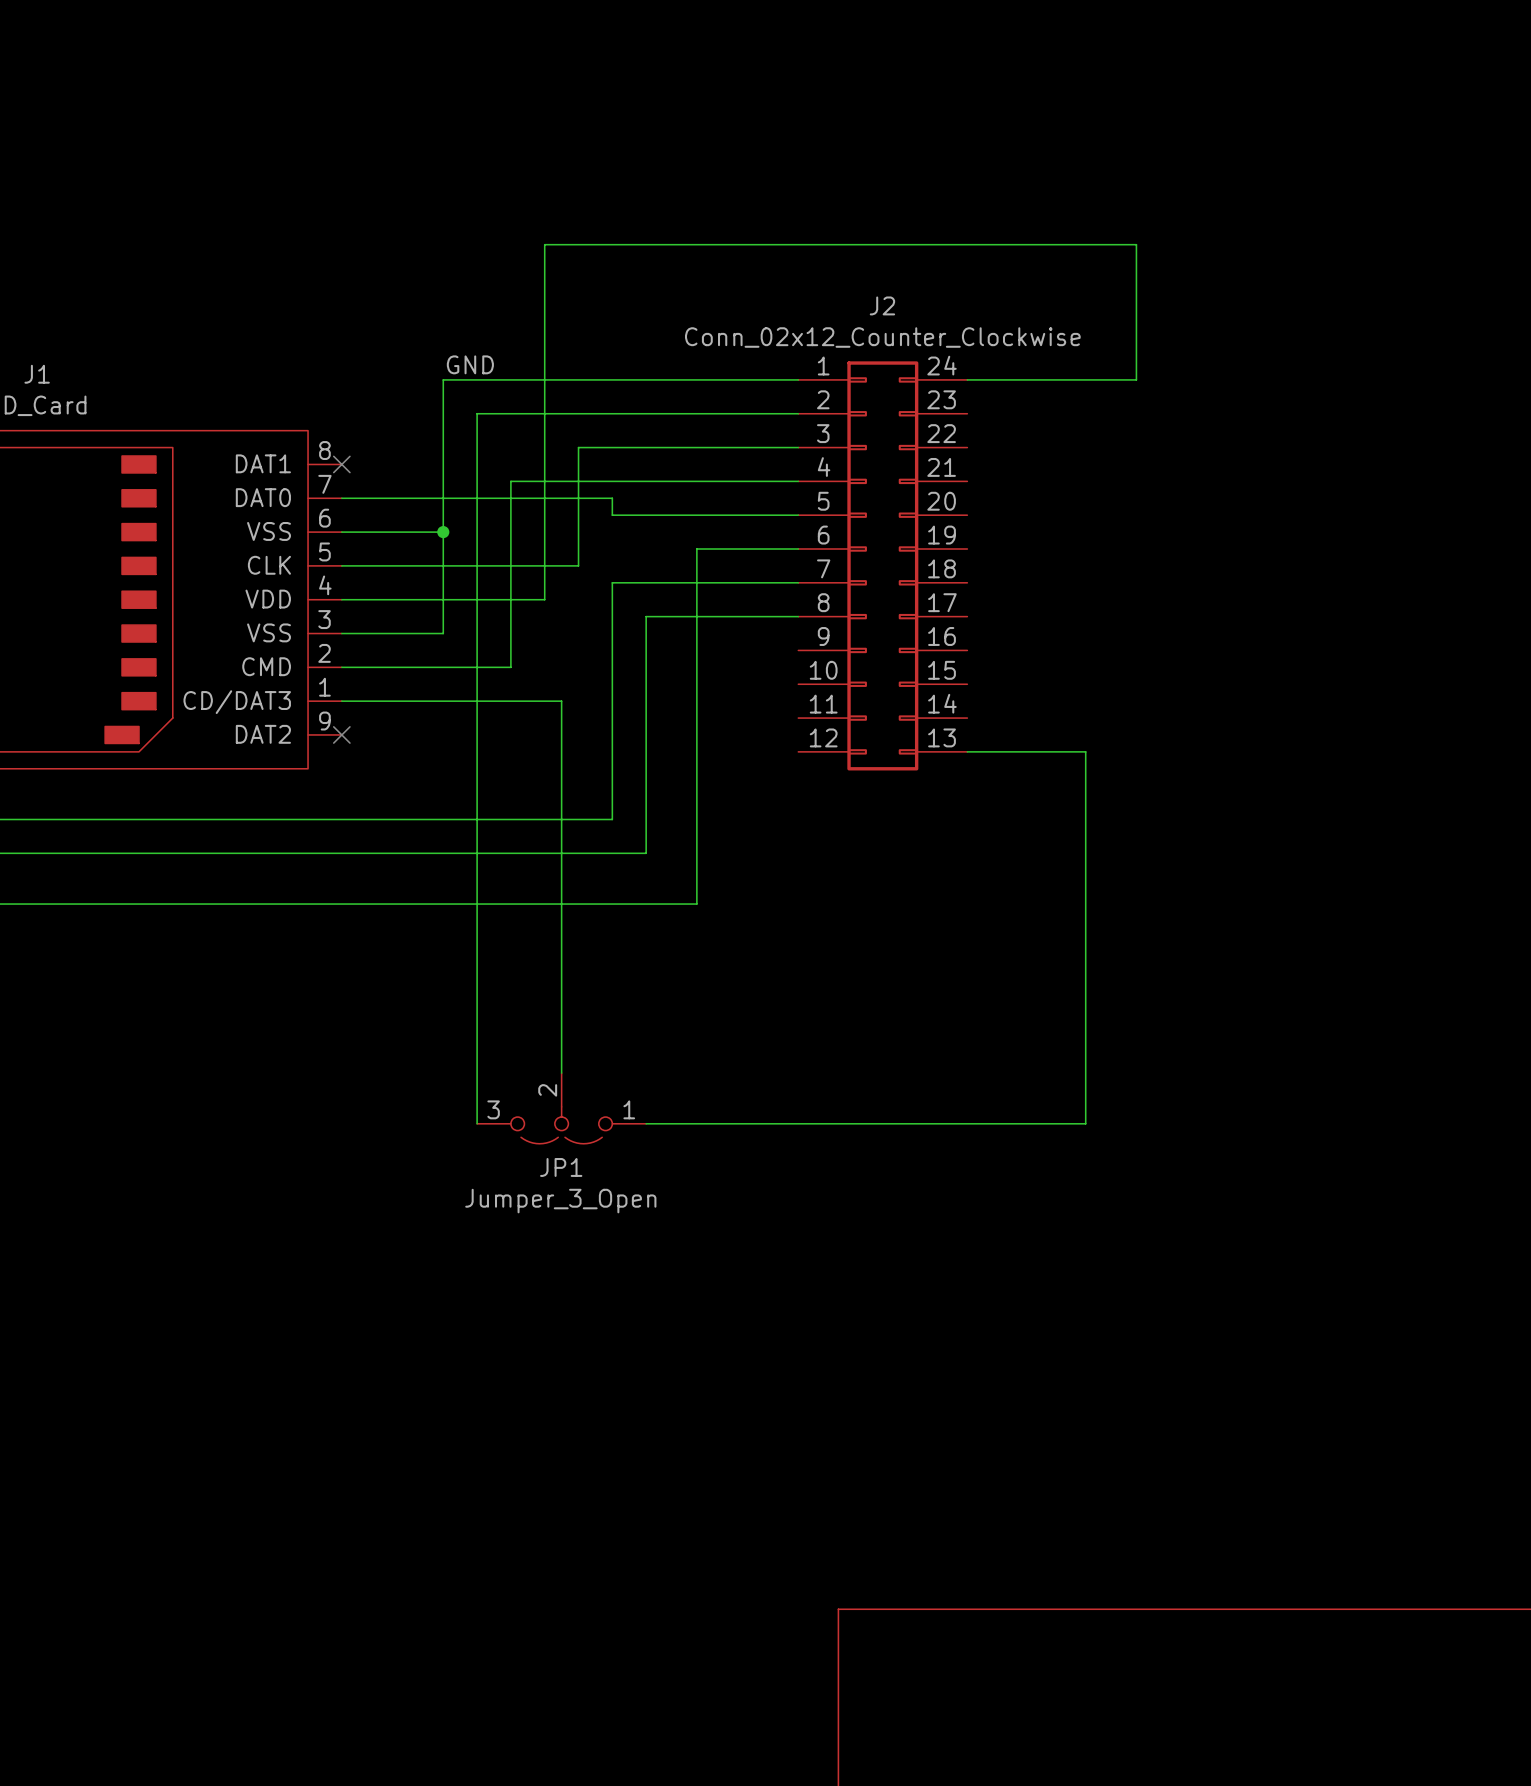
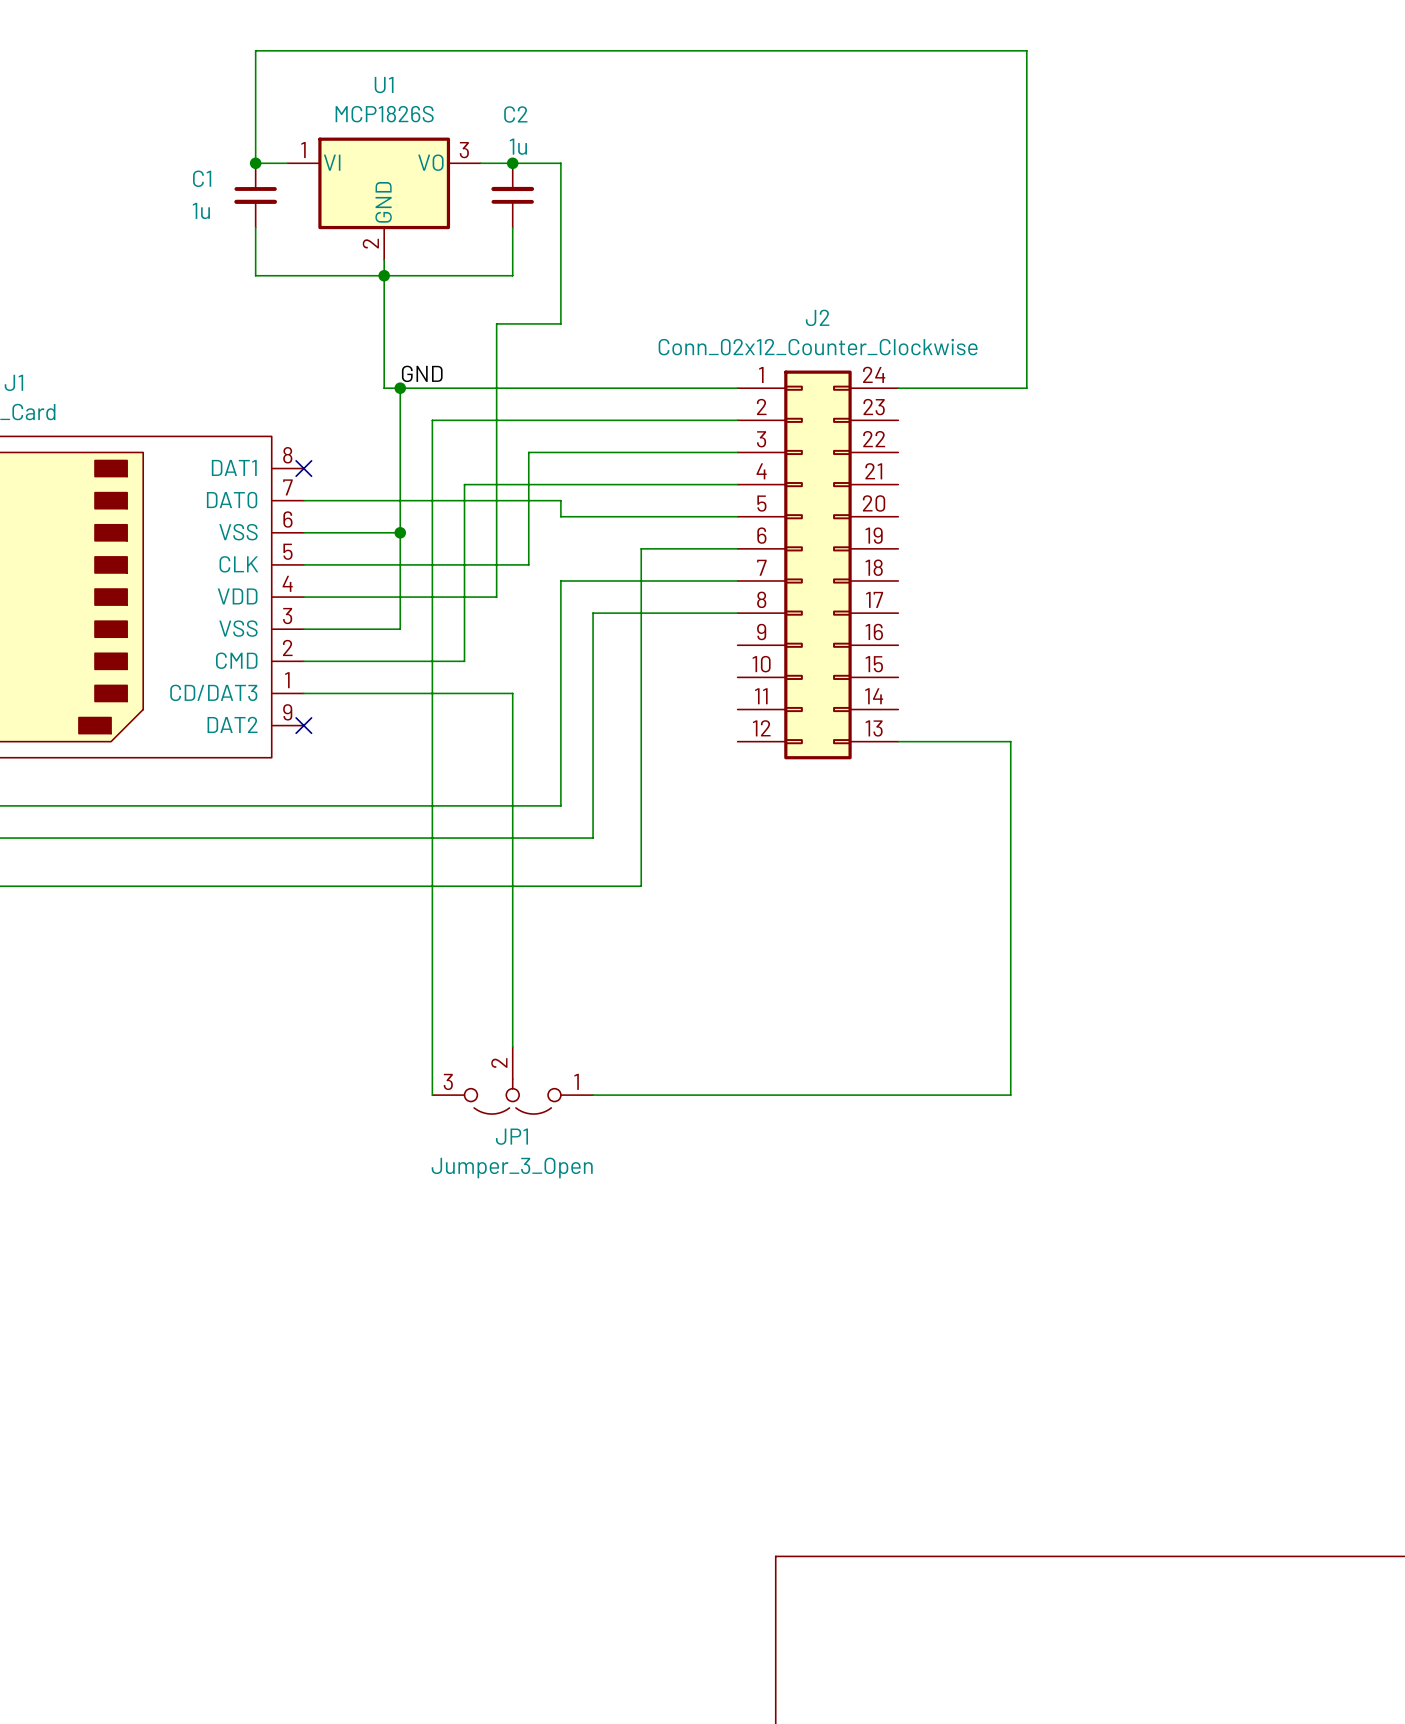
junction: none -> (255, 163)
wire: none -> (480, 163) (560, 163) (560, 323) (496, 323)
junction: none -> (512, 163)
C1: none -> 1u (255, 195)
C2: none -> 1u (512, 195)
U1: none -> MCP1826S (384, 198)
wire: none -> (255, 227) (255, 275) (512, 275) (512, 227)
wire: none -> (384, 259) (384, 388) (400, 388)
junction: none -> (384, 275)
wire: (544, 312) (544, 244) (1136, 244) (1136, 379) (1102, 379) -> (287, 163) (255, 163) (255, 50) (1026, 50) (1026, 388)
junction: none -> (400, 388)

